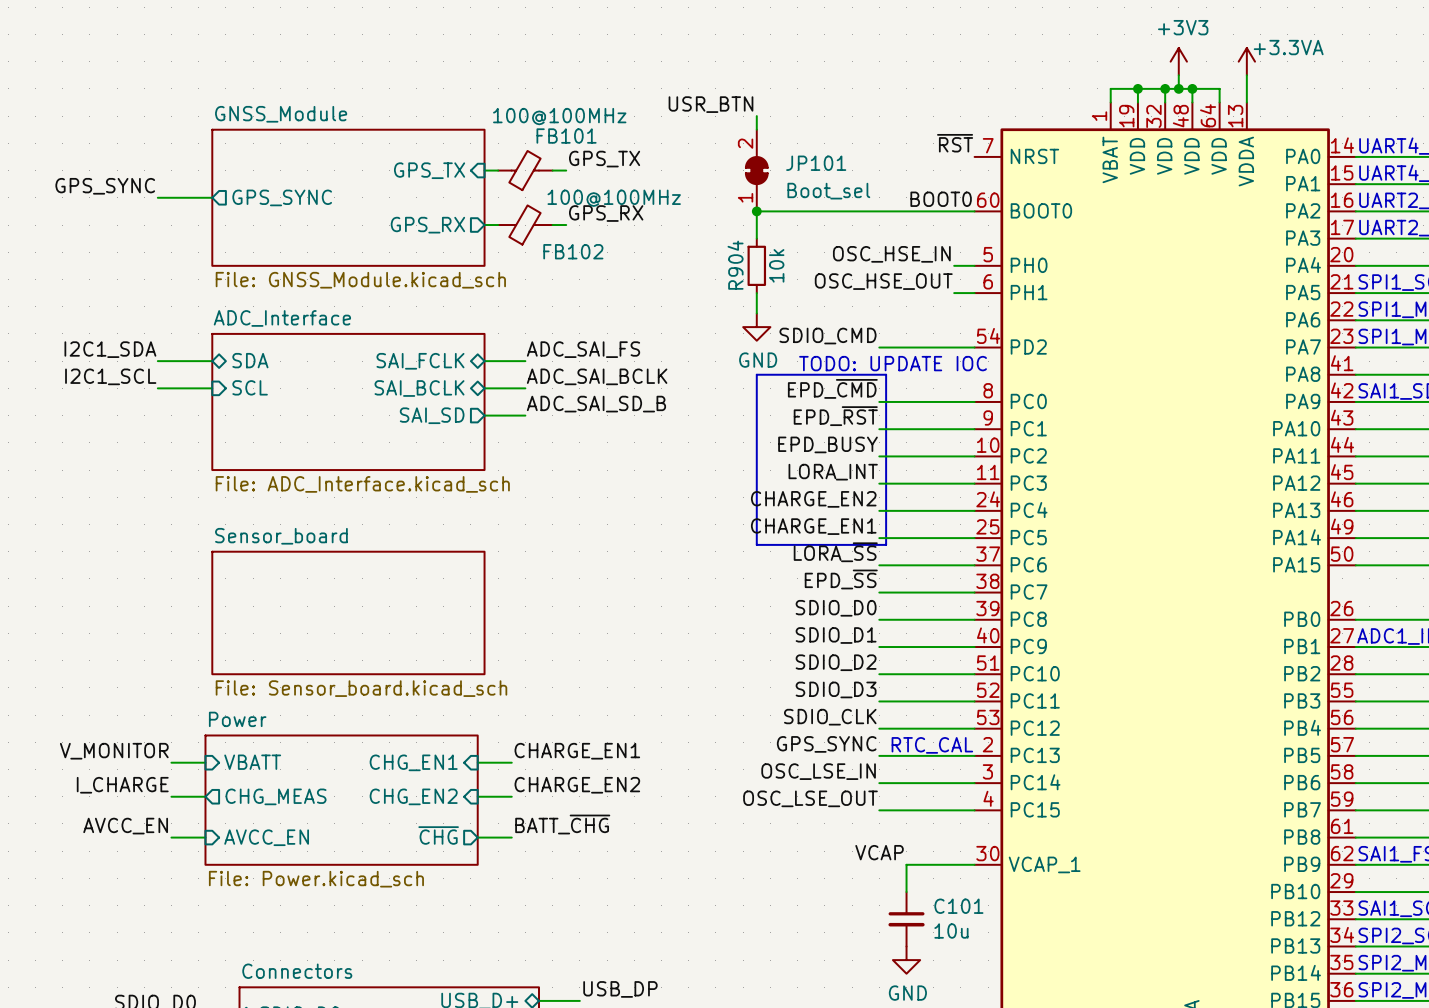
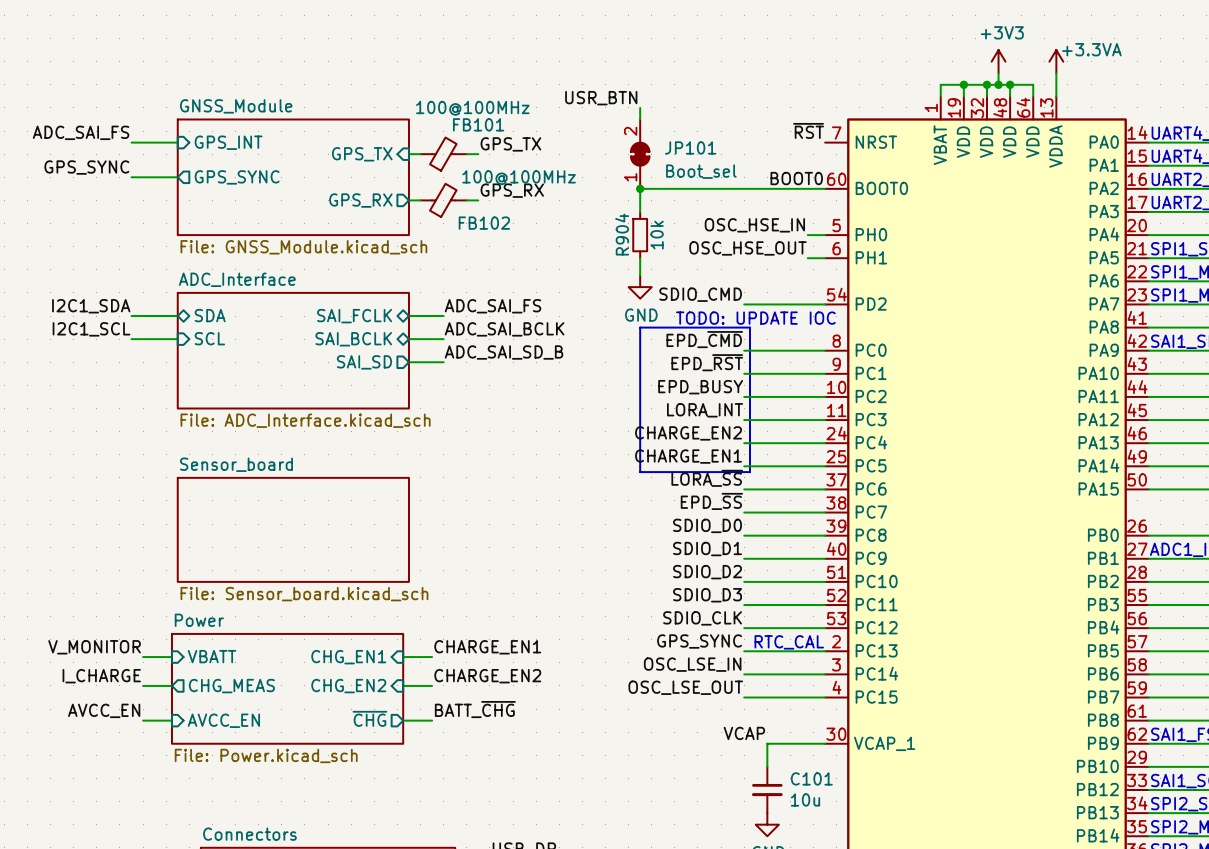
label: none -> ADC_SAI_FS (81, 132)
wire: none -> (131, 142) (177, 142)
sheet pin: none -> GPS_INT (228, 142)

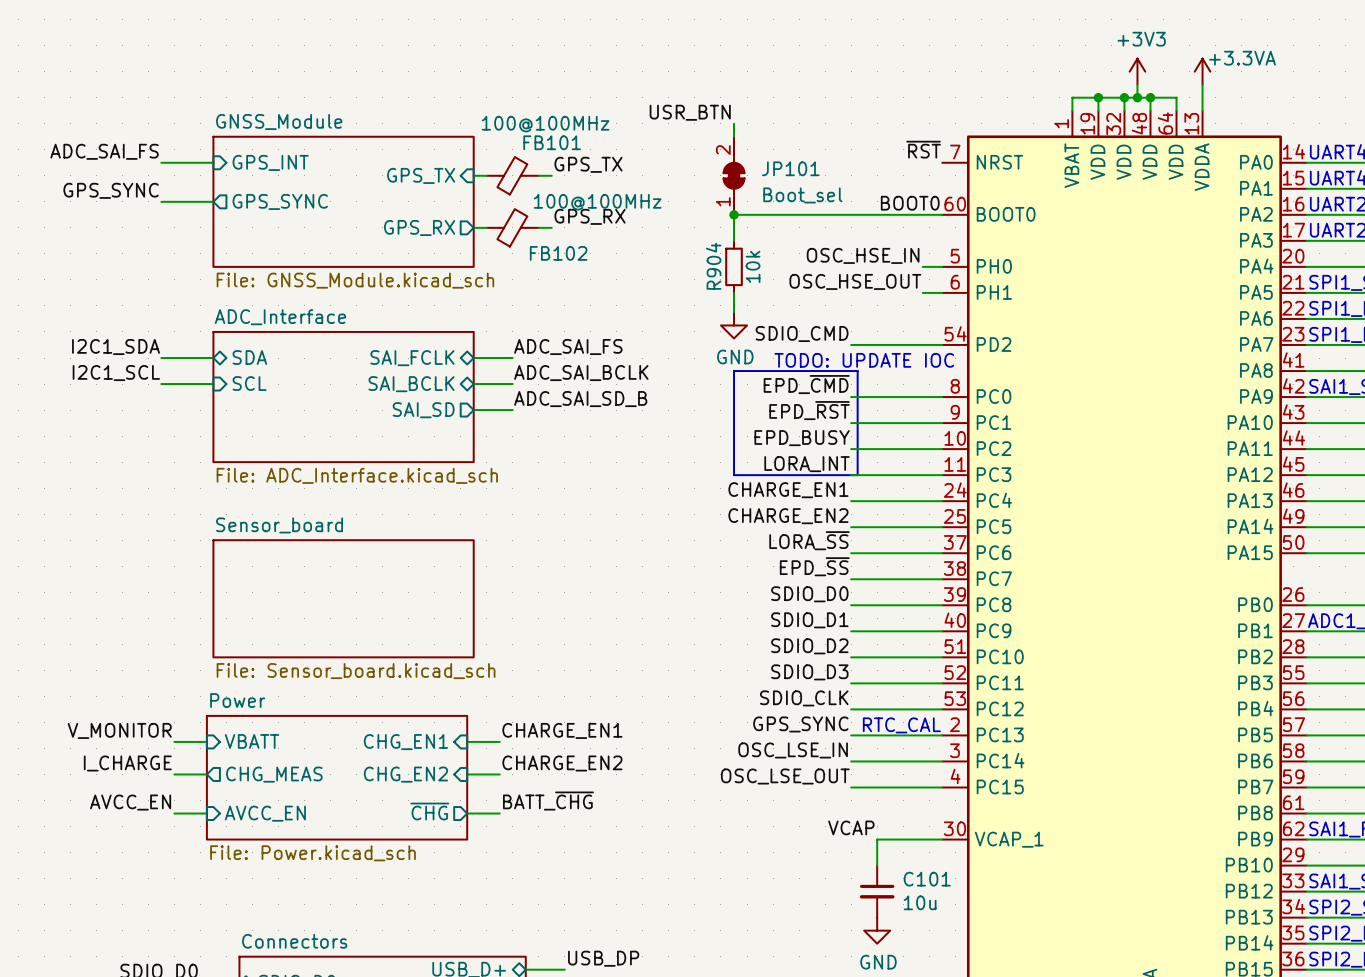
line: (640, 420) (640, 472) (750, 472) (750, 420) -> (734, 475) (857, 475)
label: CHARGE_EN2 (688, 433) -> CHARGE_EN1 (788, 490)
label: CHARGE_EN1 (688, 456) -> CHARGE_EN2 (788, 516)

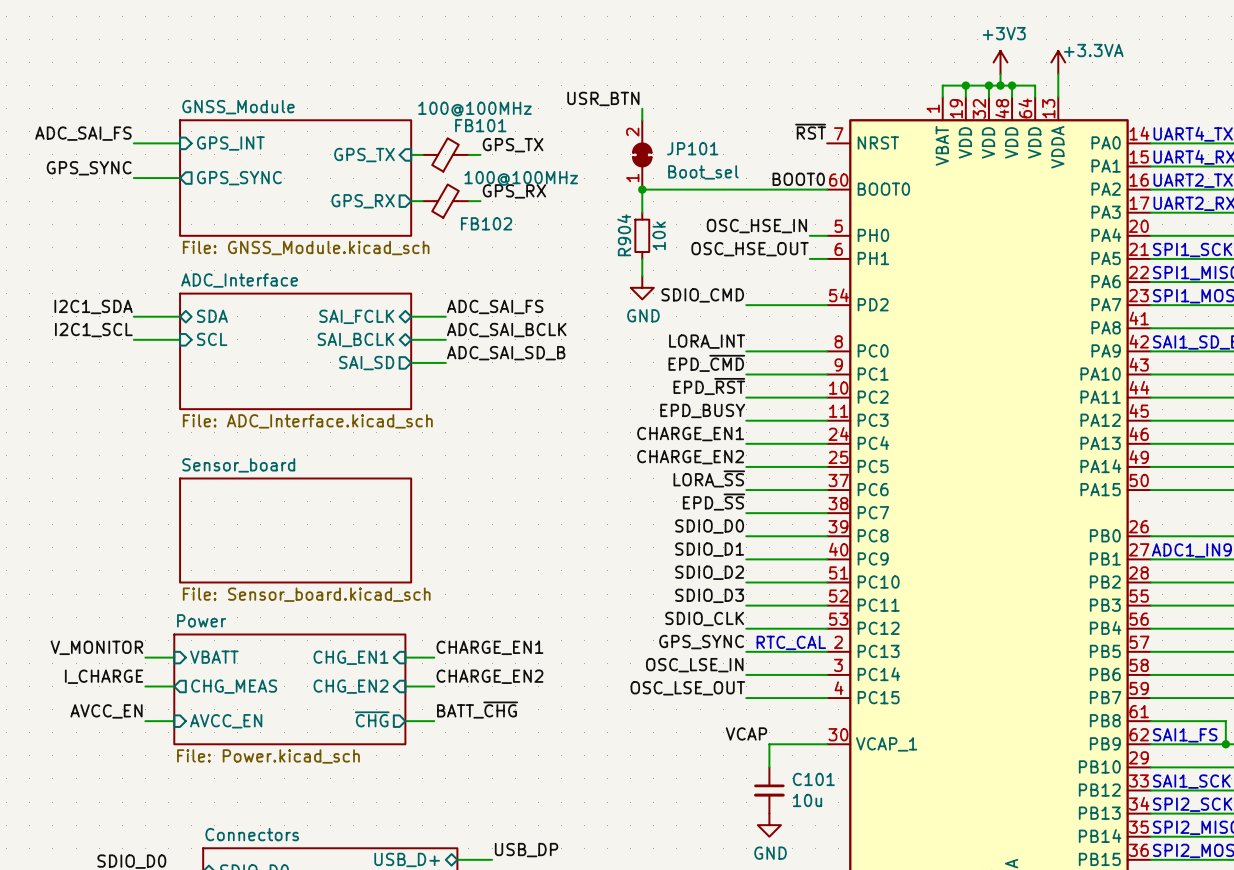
text: TODO: UPDATE IOC (864, 360) -> none
line: (734, 371) (857, 371) (857, 475) (734, 475) (734, 371) -> none
label: EPD_~{CMD} (806, 384) -> LORA_INT (707, 341)
label: EPD_~{RST} (809, 410) -> EPD_~{CMD} (706, 363)
label: EPD_BUSY (802, 438) -> EPD_~{RST} (709, 386)
label: LORA_INT (807, 464) -> EPD_BUSY (702, 410)

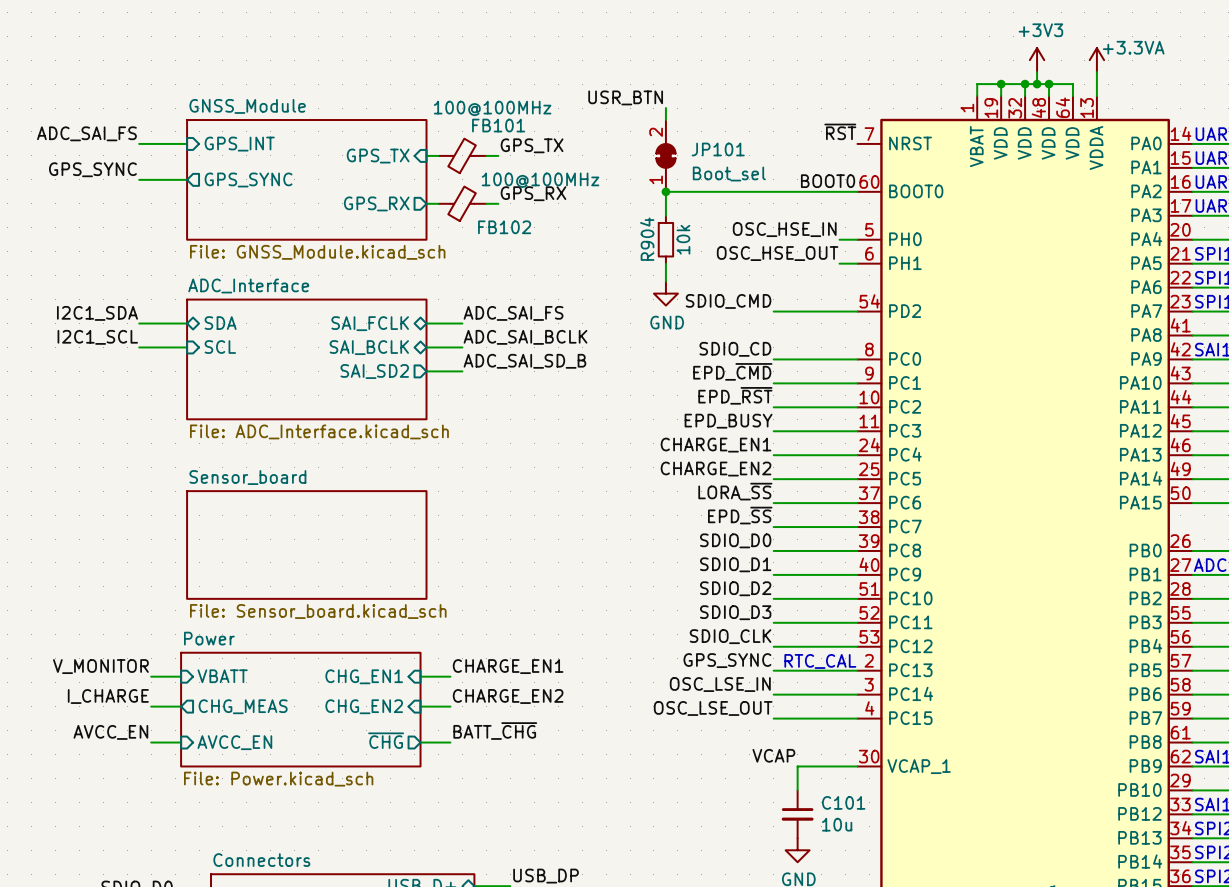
label: LORA_INT (707, 341) -> SDIO_CD (735, 349)
sheet pin: SAI_SD (366, 363) -> SAI_SD2 (374, 371)

